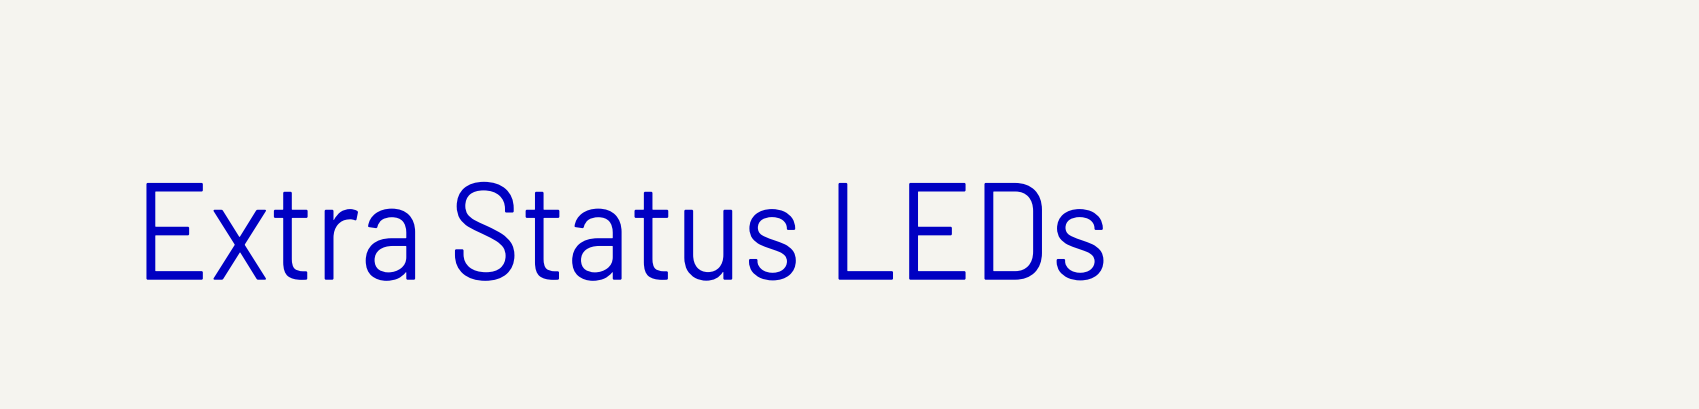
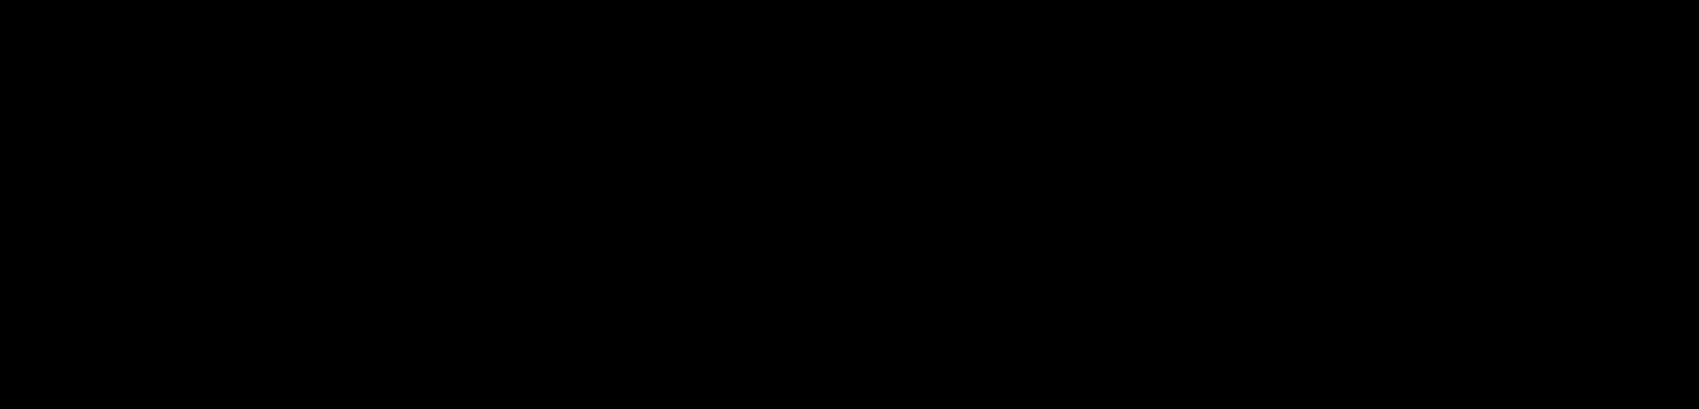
text: Extra Status LEDs (624, 231) -> none

